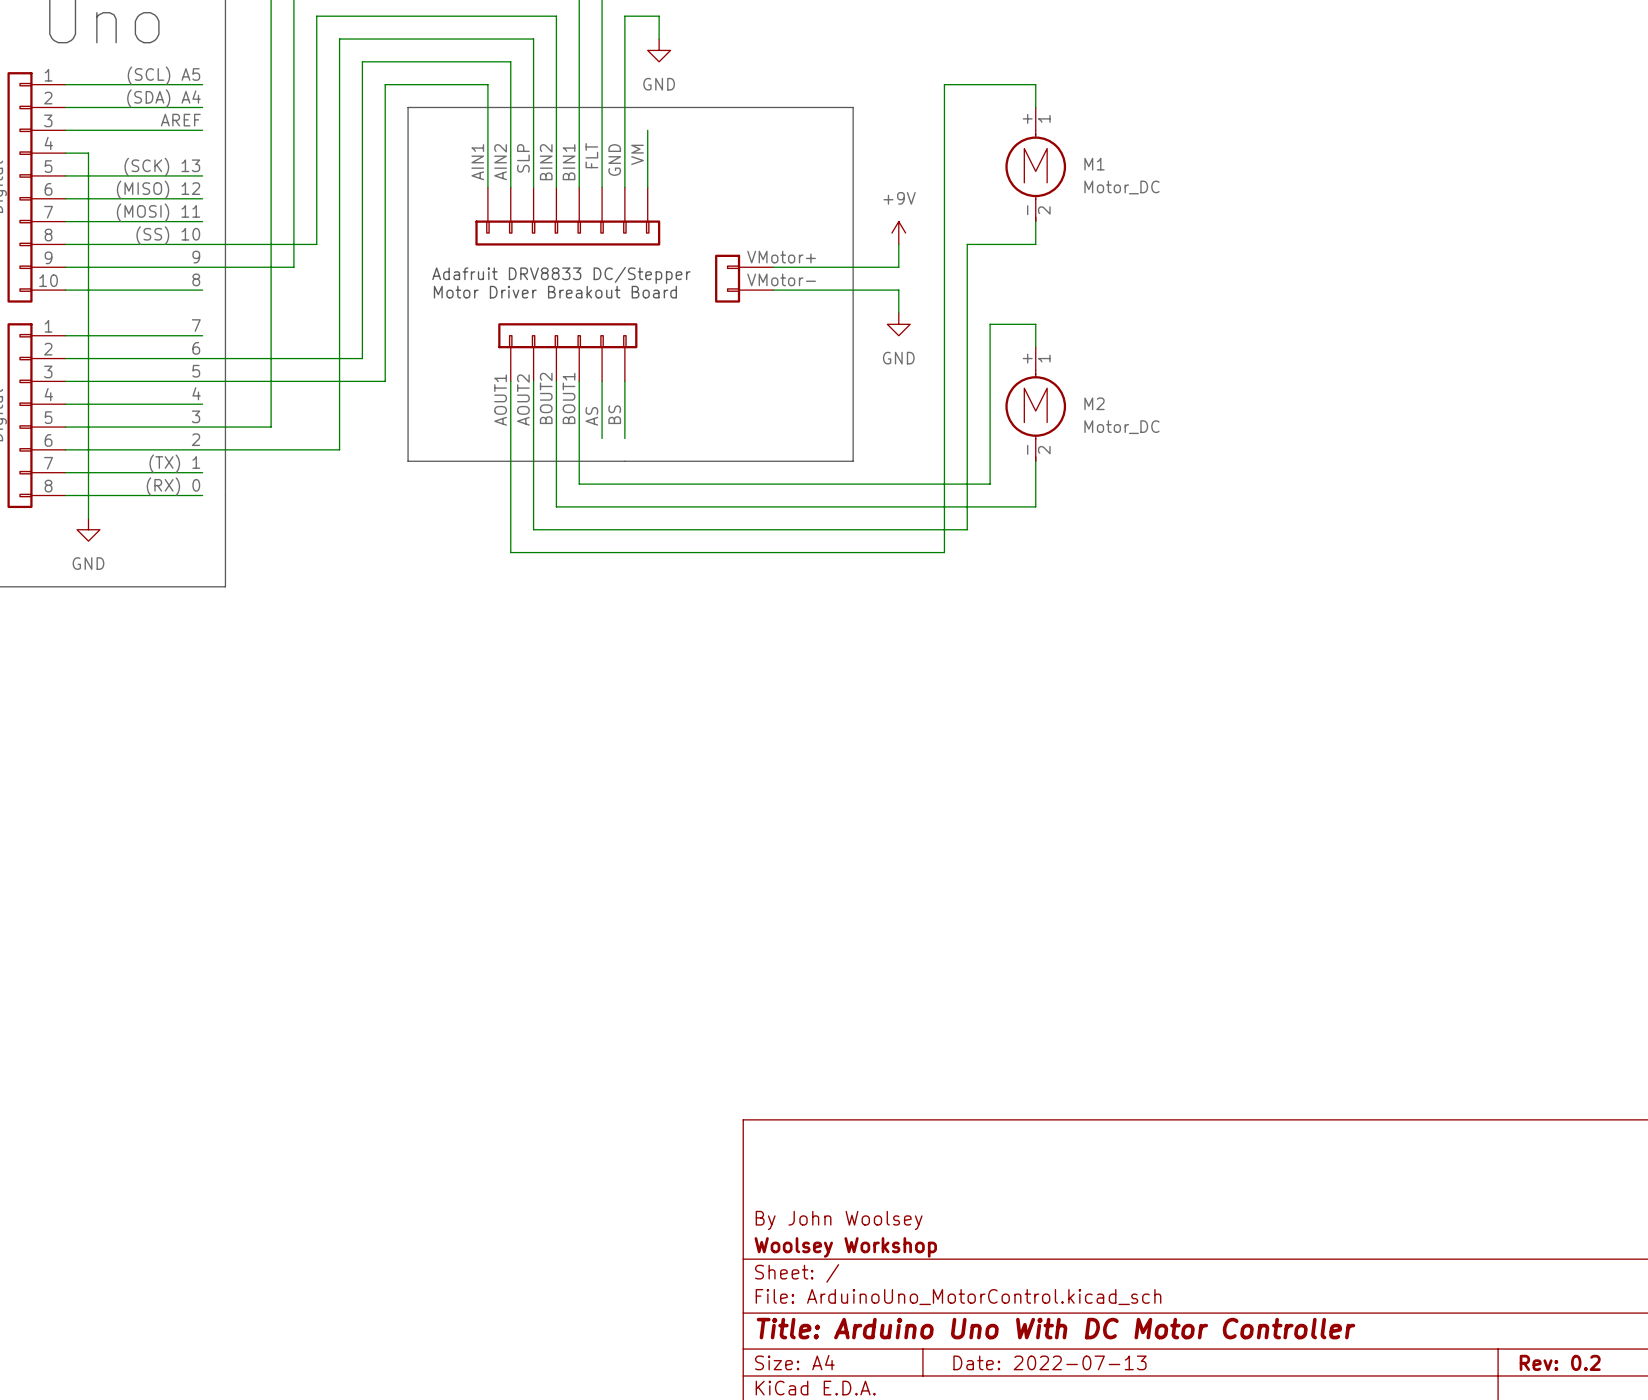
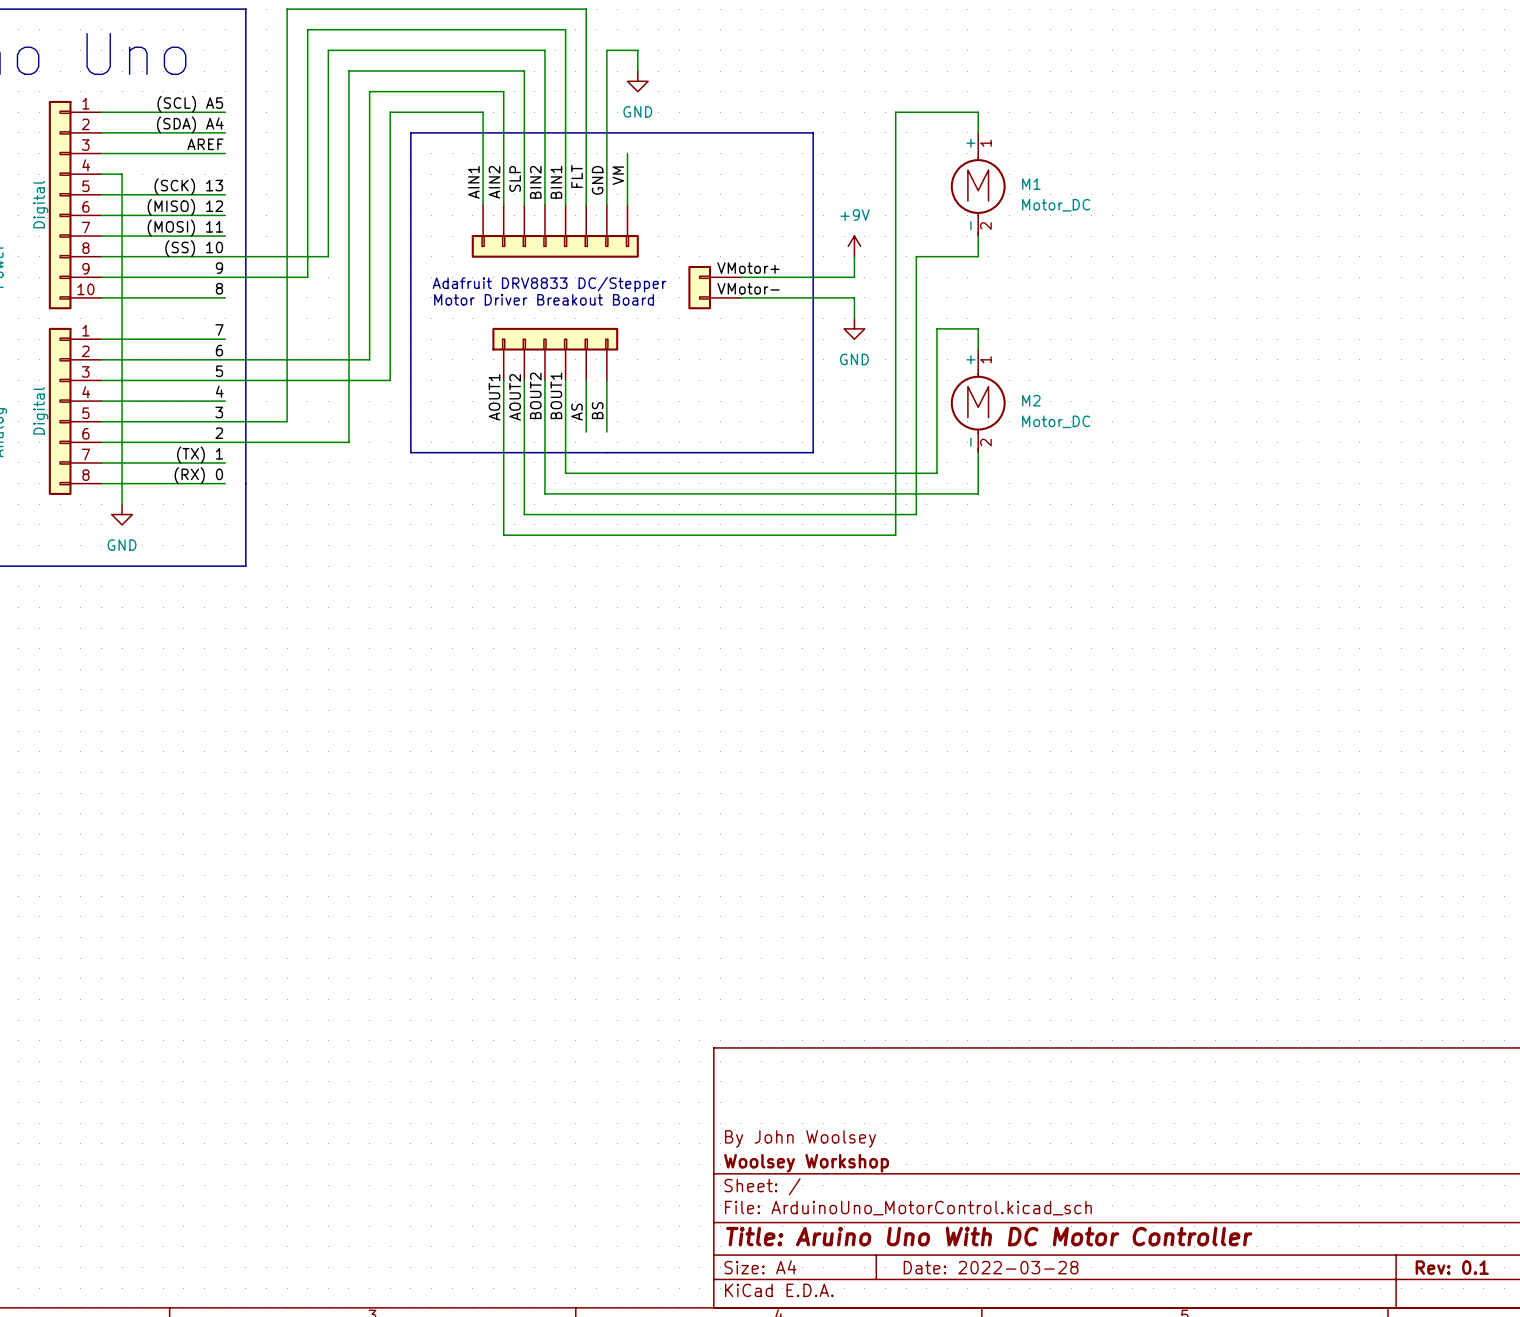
title block: Title: Arduino Uno With DC Motor Controller (1056, 1328) -> Title: Aruino Uno With DC Motor Controller (989, 1236)
title block: Date: 2022-07-13 (1049, 1362) -> Date: 2022-03-28 (991, 1267)
title block: Rev: 0.2 (1560, 1362) -> Rev: 0.1 (1452, 1267)

